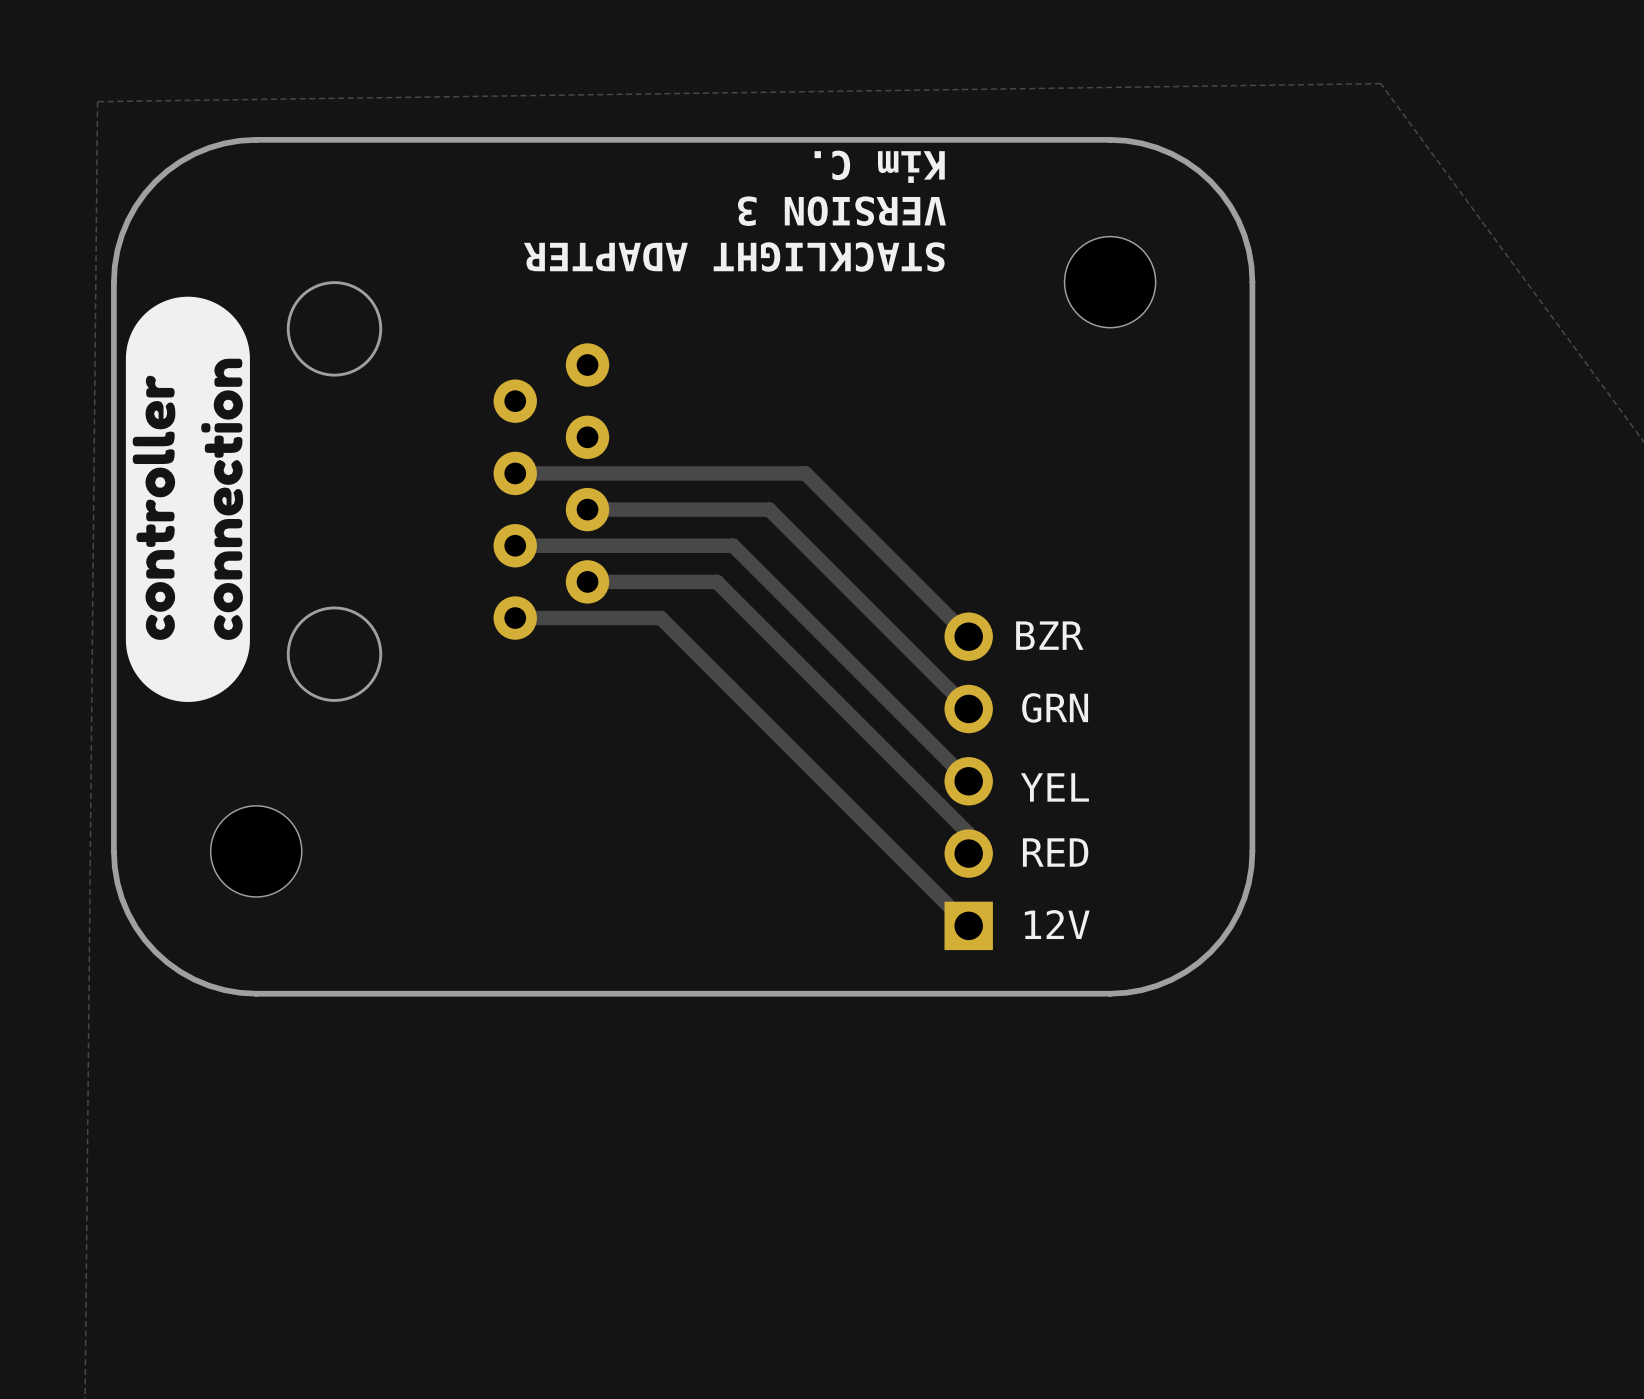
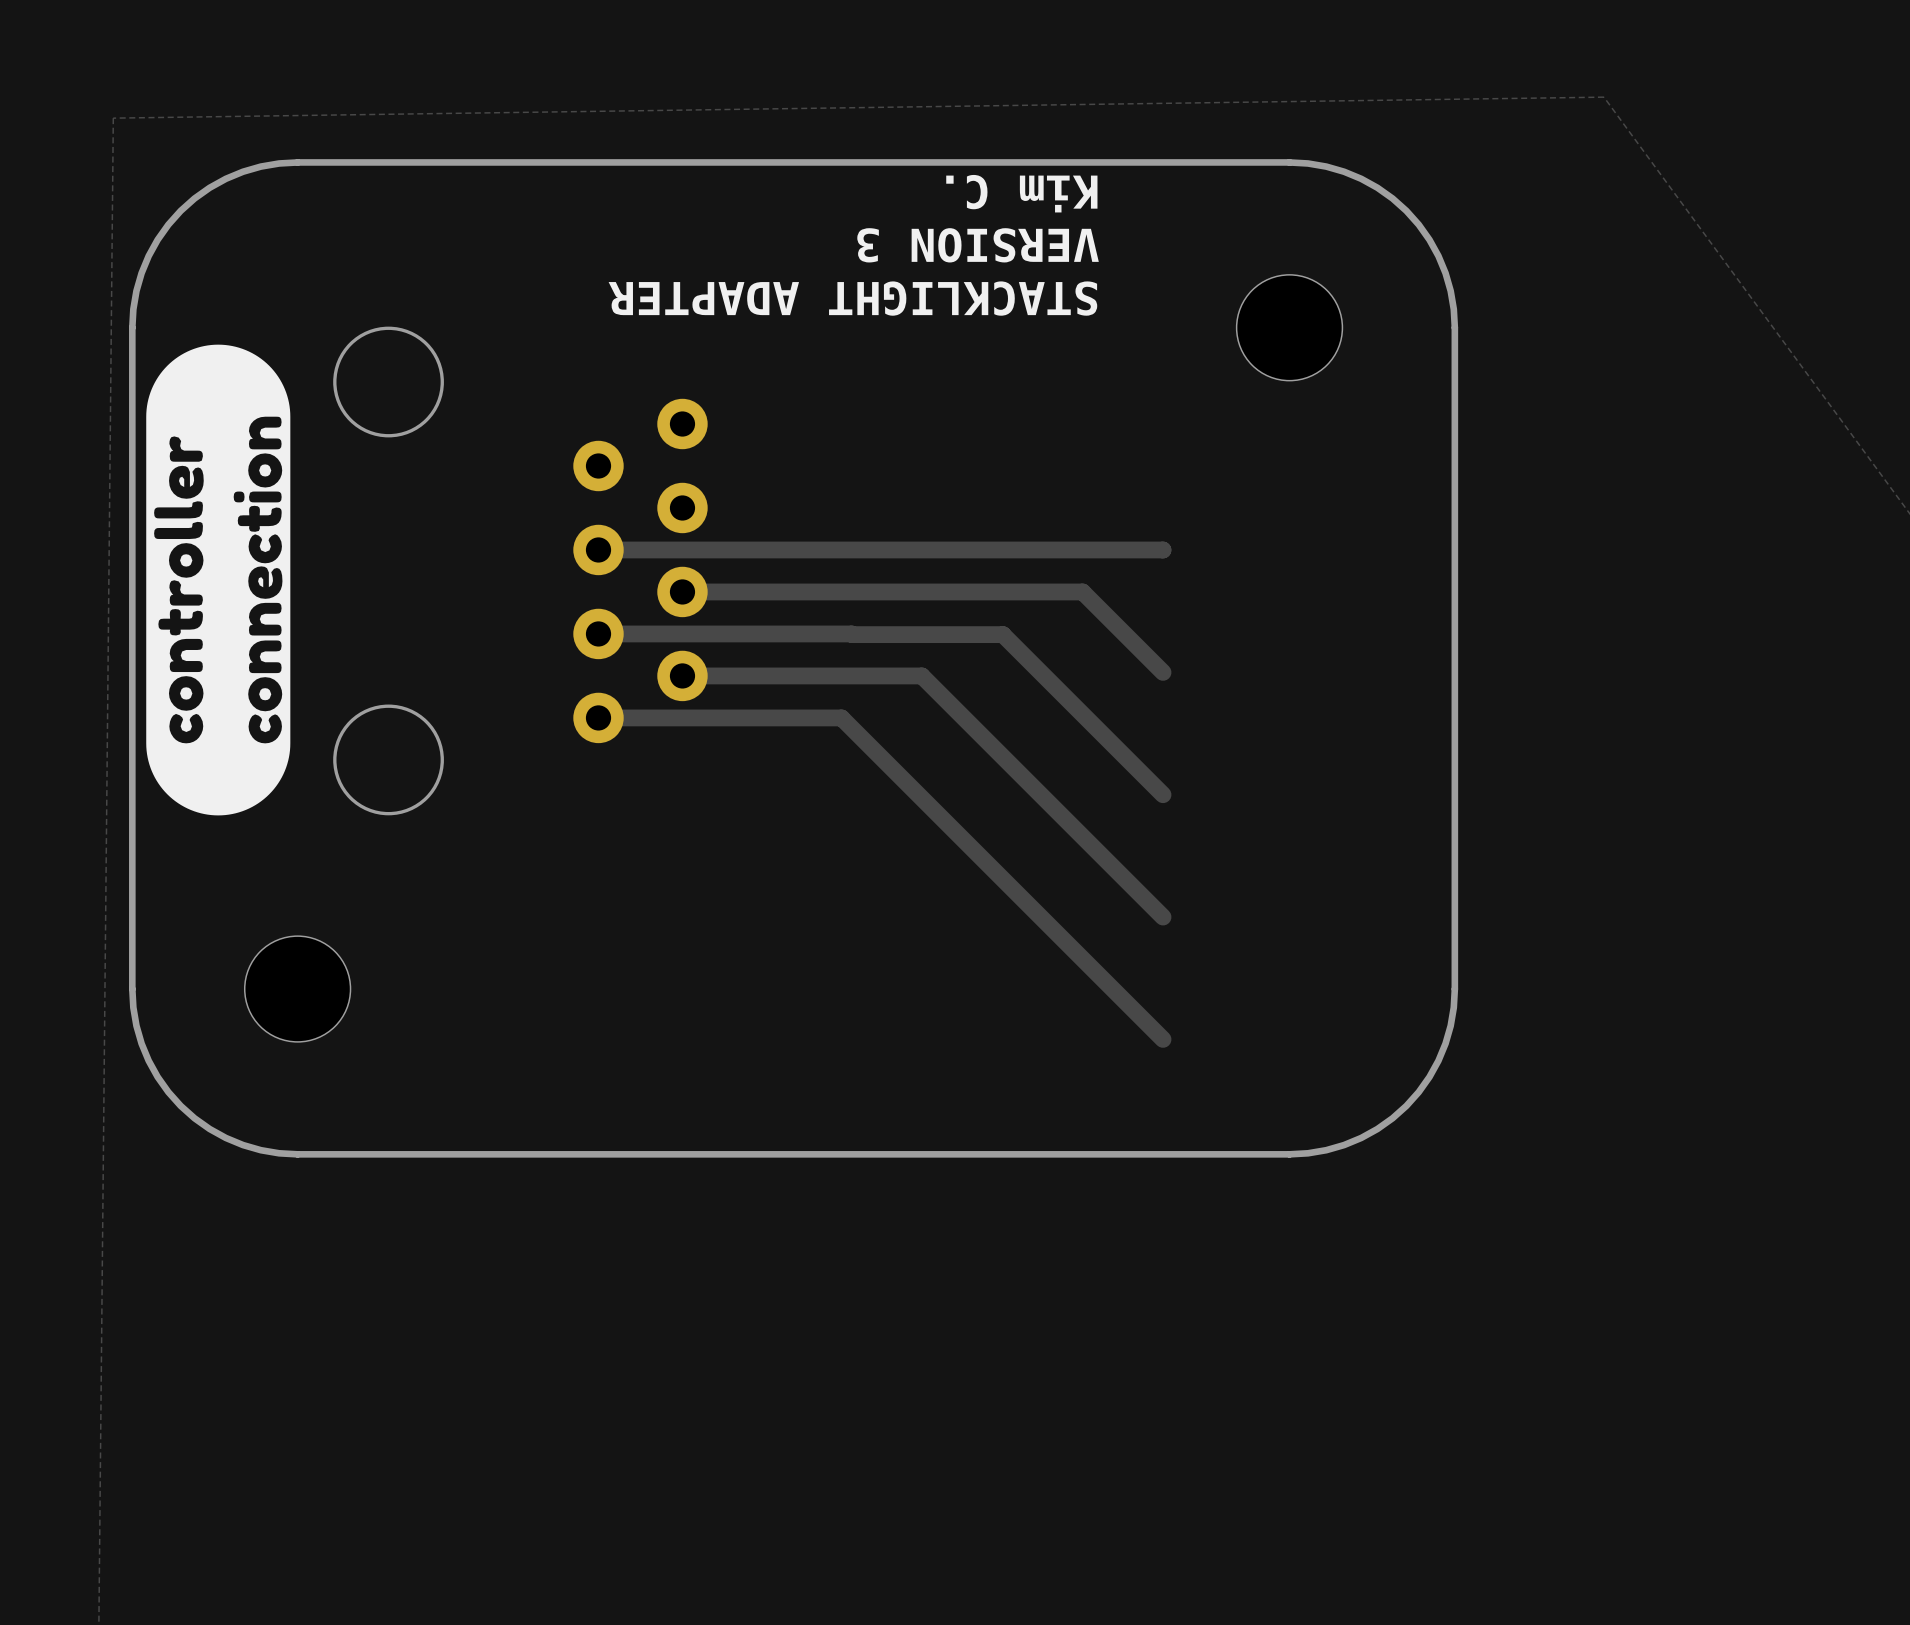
track: (805, 473) (968, 636) -> (935, 549) (1162, 549)
track: (769, 509) (968, 708) -> (893, 591) (1082, 591) (1163, 672)
track: (733, 546) (968, 781) -> (852, 634) (1002, 634) (1163, 794)
track: (716, 581) (968, 833) (968, 853) -> (832, 675) (921, 675) (1163, 917)
track: (660, 618) (968, 925) -> (767, 717) (841, 717) (1163, 1039)
text: BZR (1049, 635) -> none
text: GRN (1055, 707) -> none
part: (968, 781) -> none
text: YEL (1054, 787) -> none
text: RED (1055, 852) -> none
text: 12V (1057, 924) -> none

